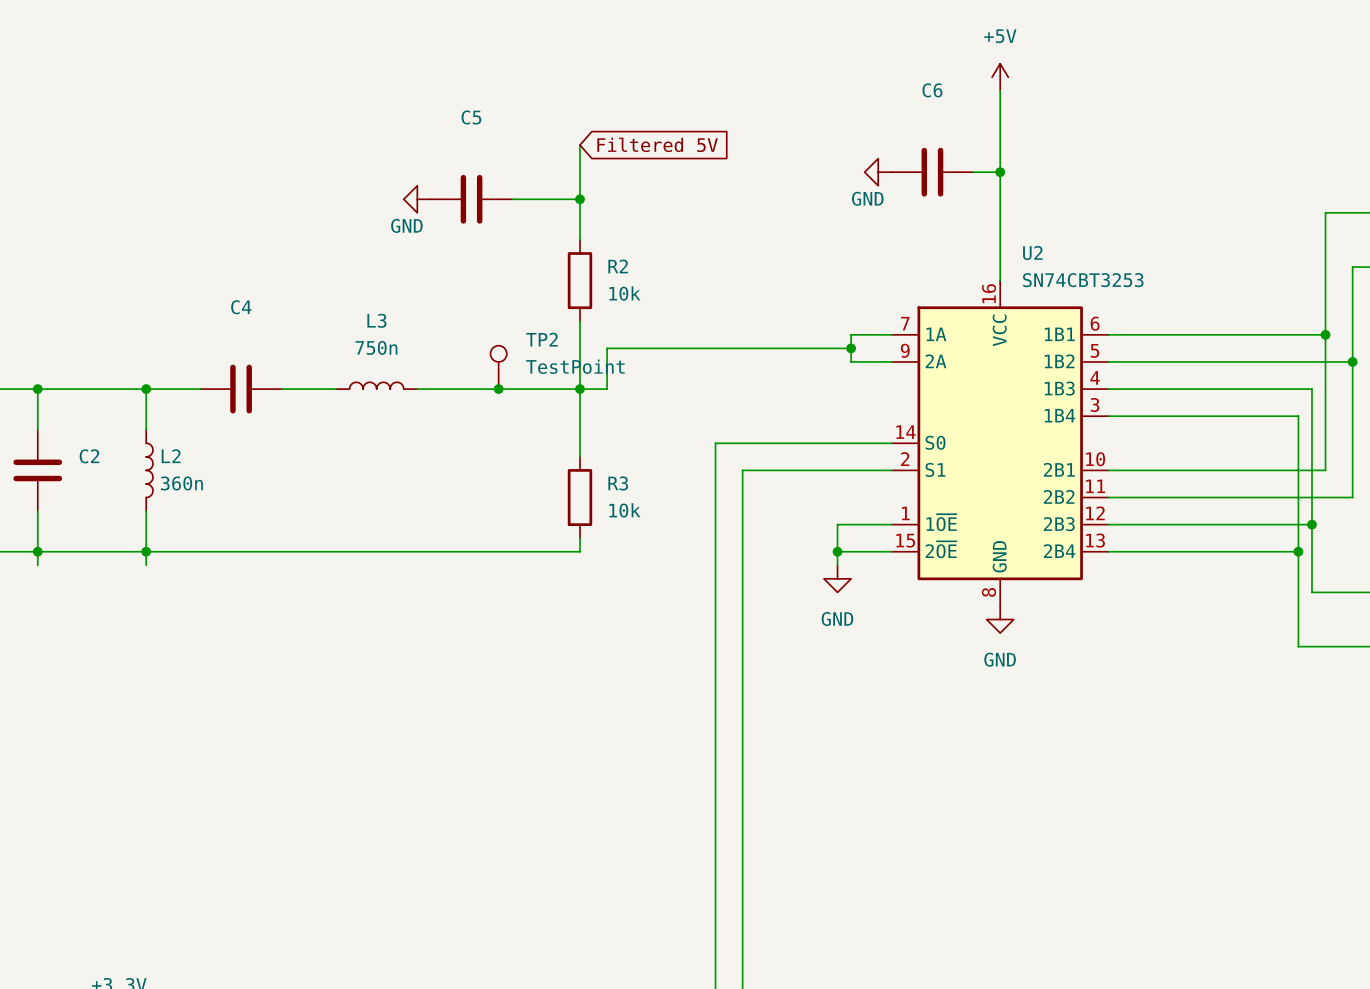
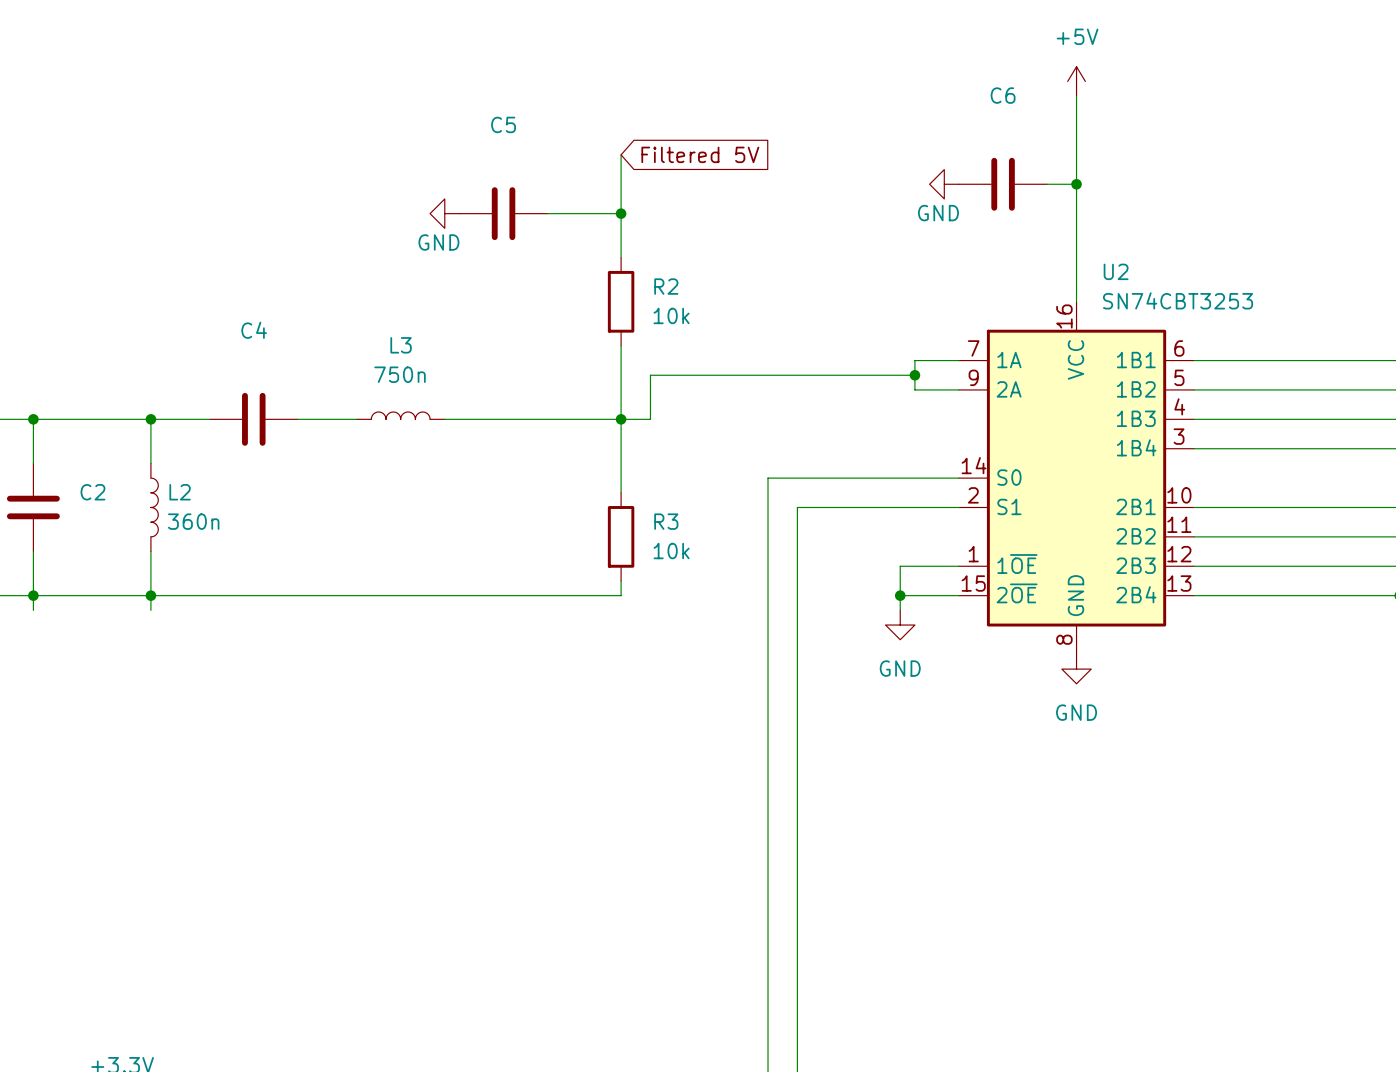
TP2: TestPoint (498, 367) -> none
junction: (498, 389) -> none

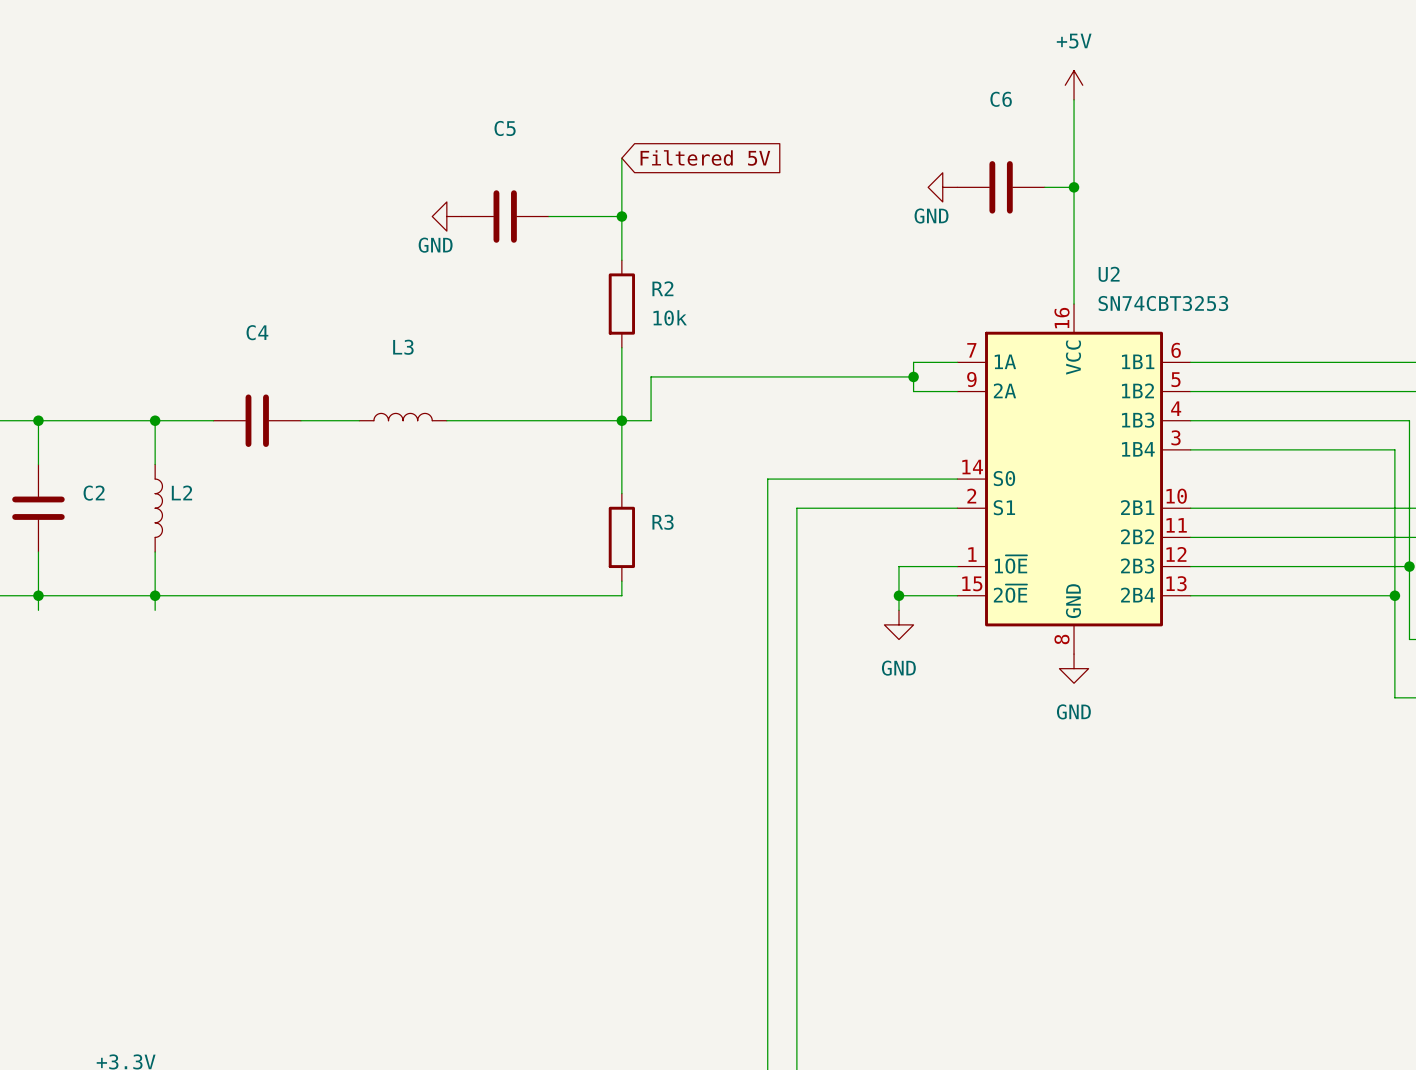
L3 value: 750n (400, 374) -> none
L2 value: 360n (193, 521) -> none
R3 value: 10k (671, 551) -> none

